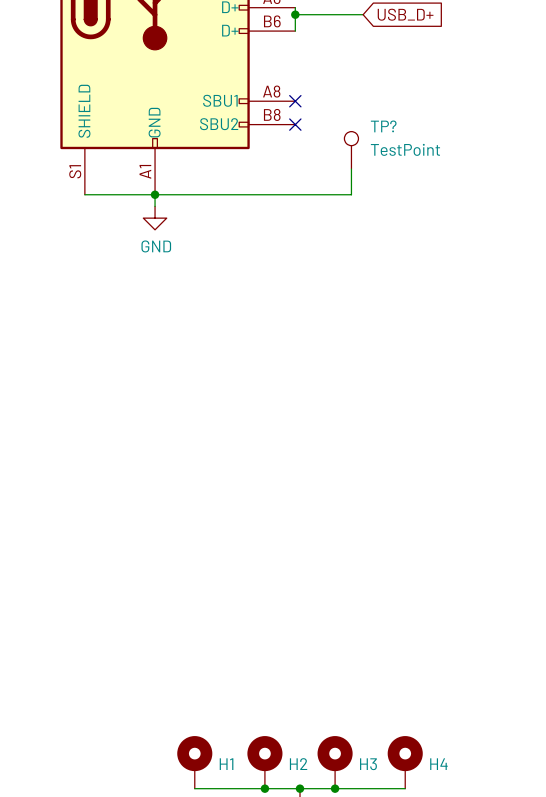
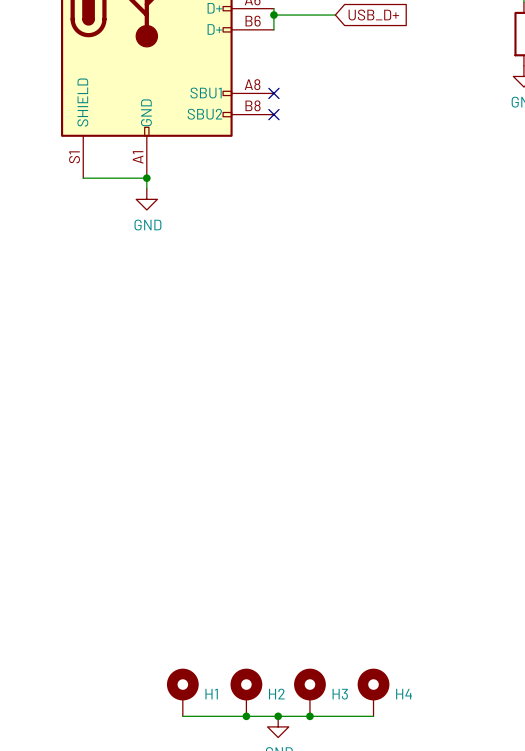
TP?: TestPoint (351, 150) -> none
wire: (351, 169) (351, 194) (155, 194) -> none

